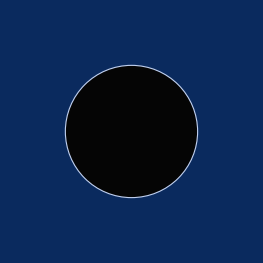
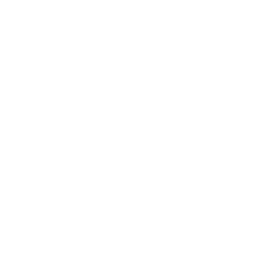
part: (131, 131) -> none

